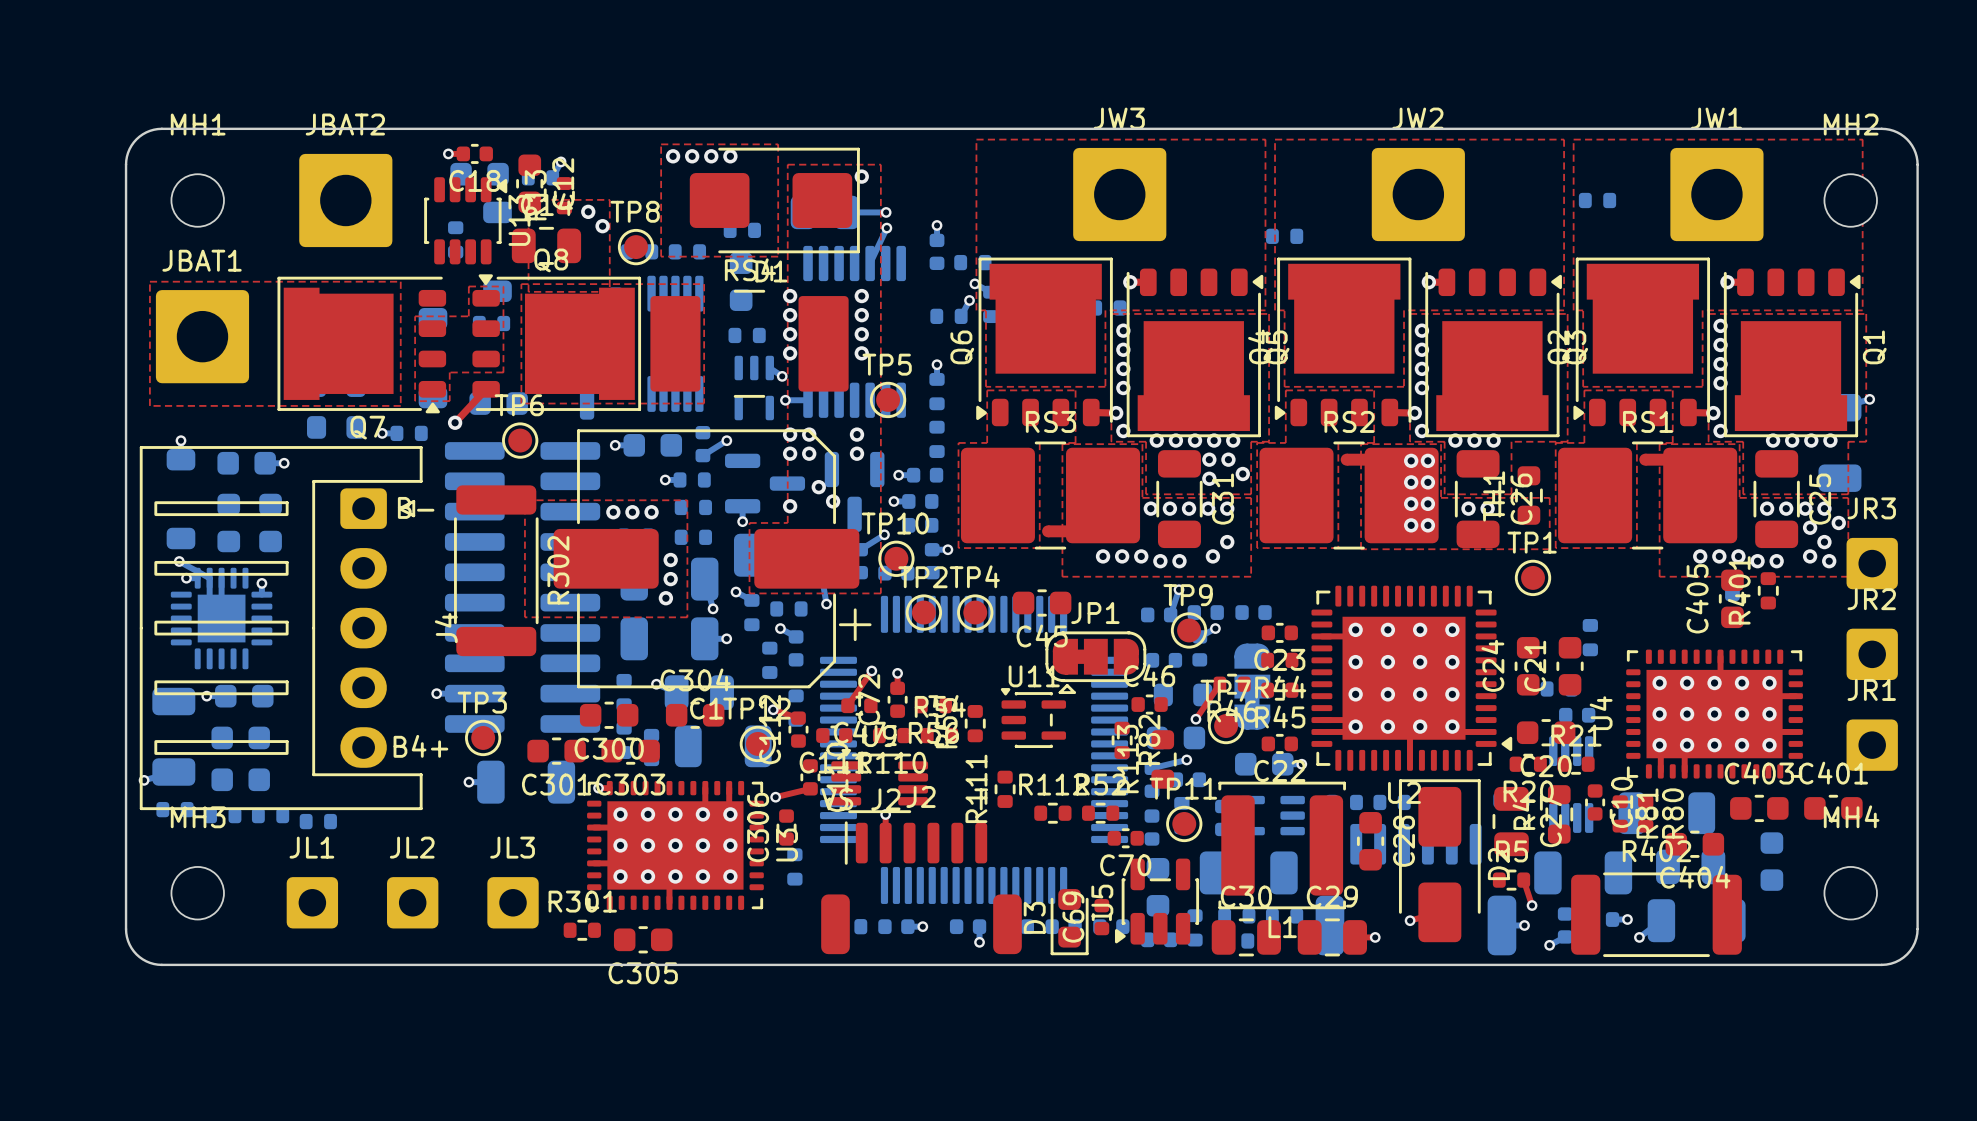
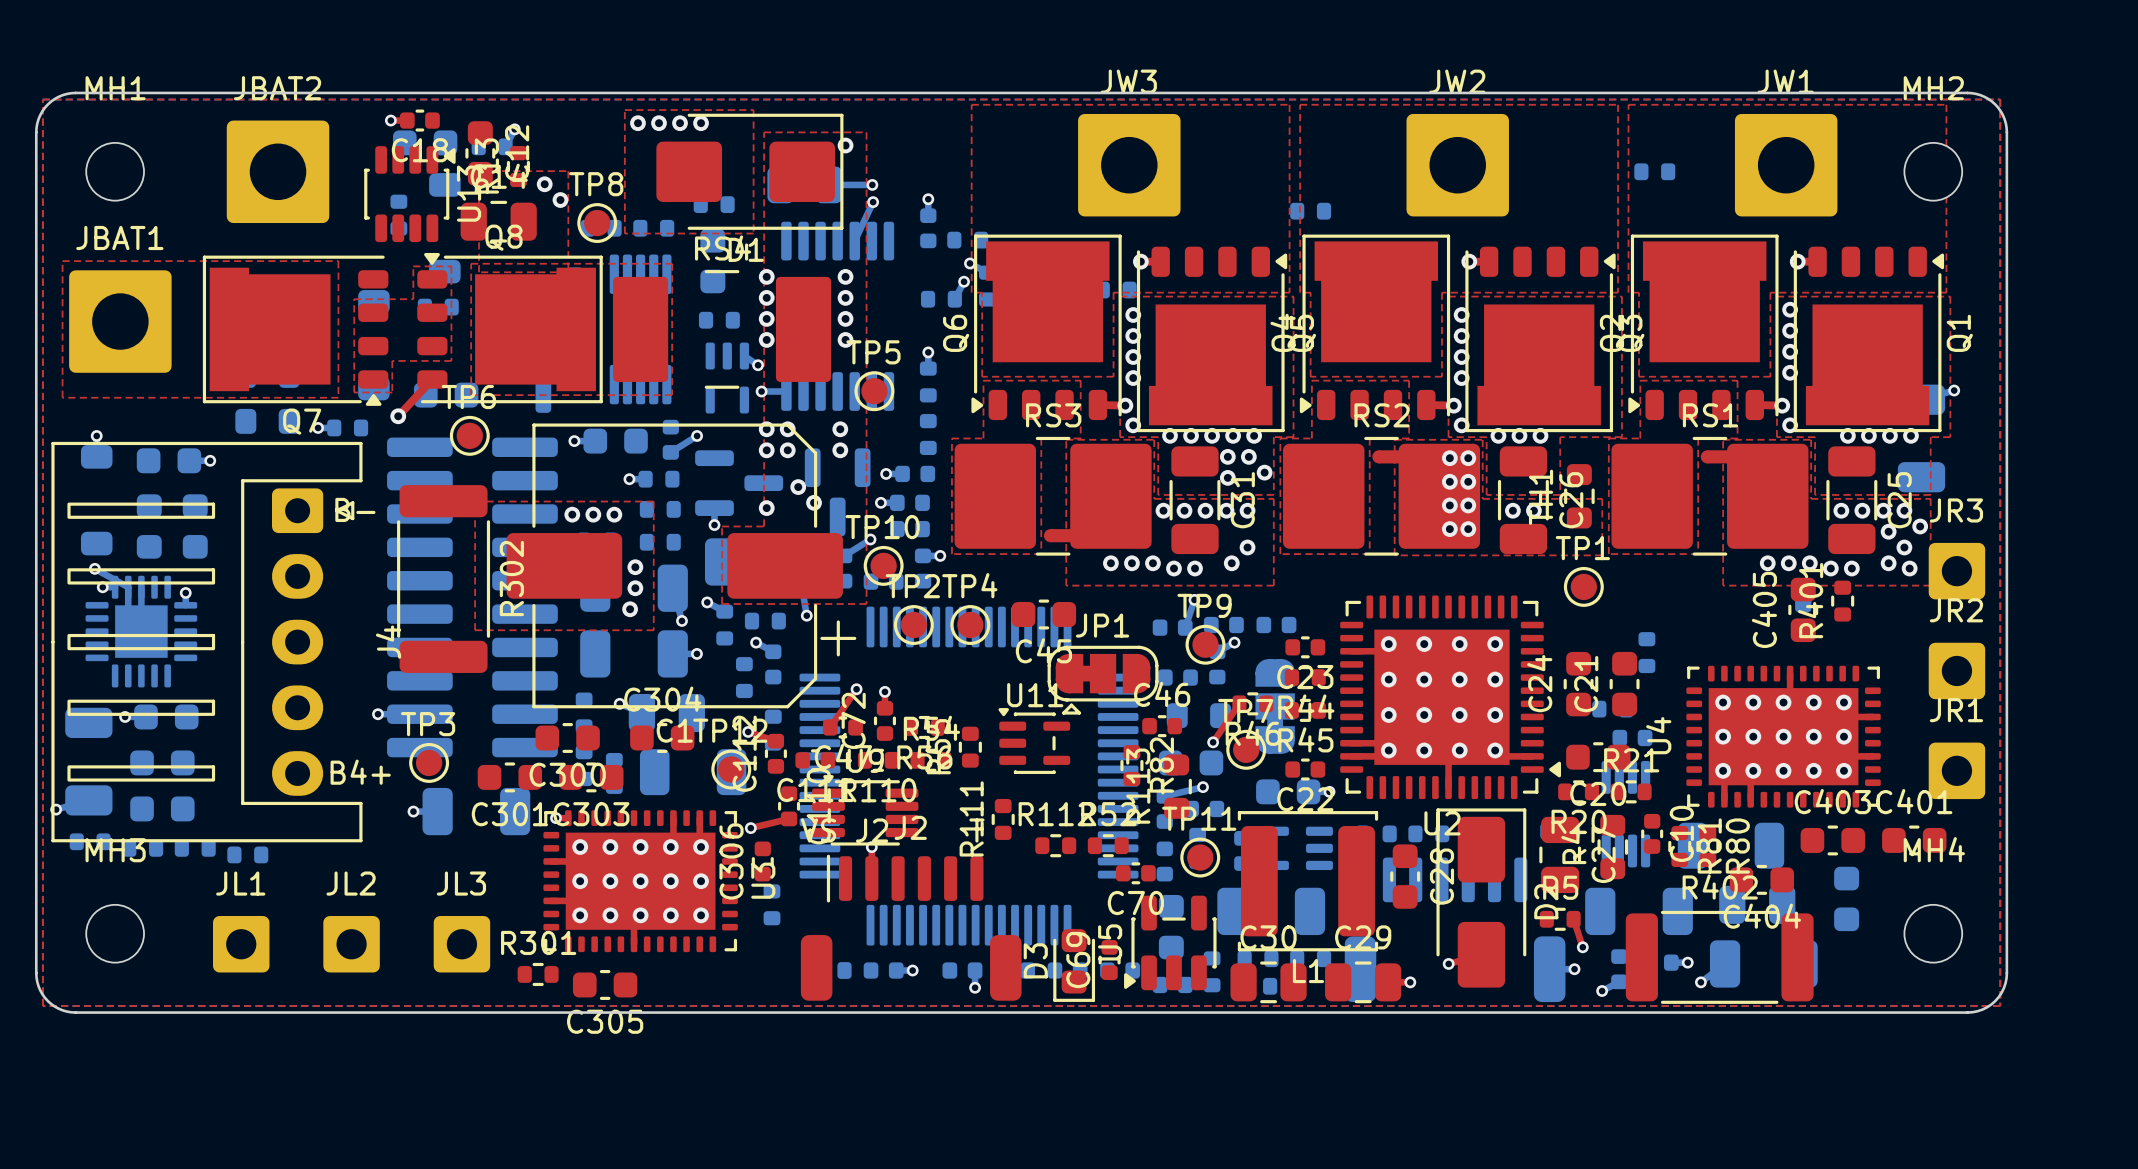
top zone outline: none -> (42, 99) (2000, 99) (2000, 1005) (42, 1005) (42, 99)

